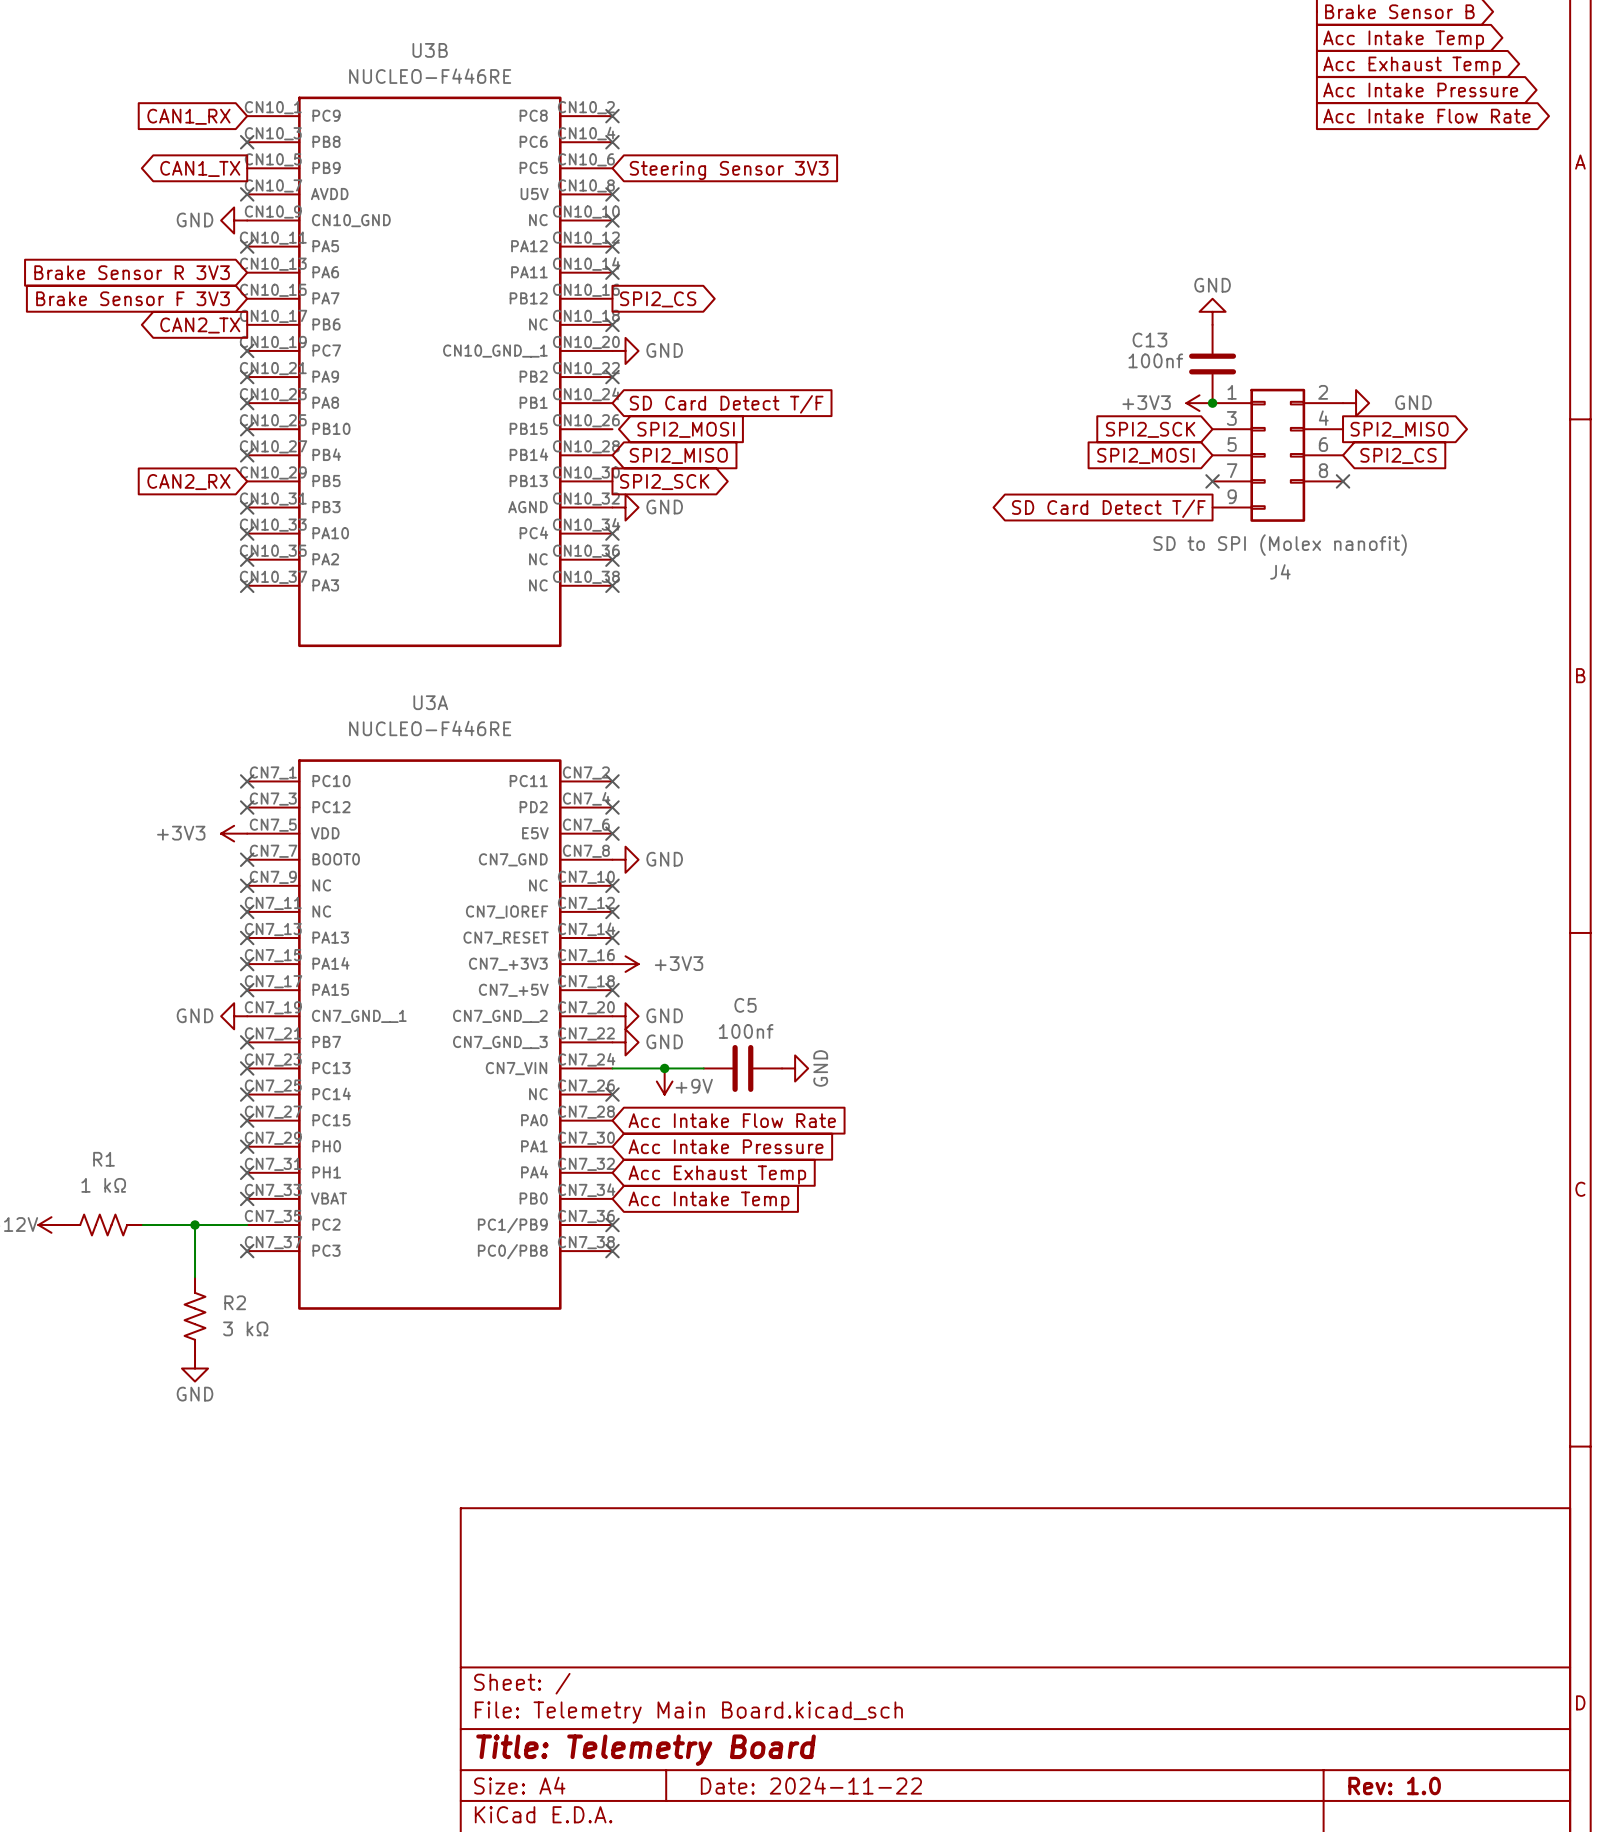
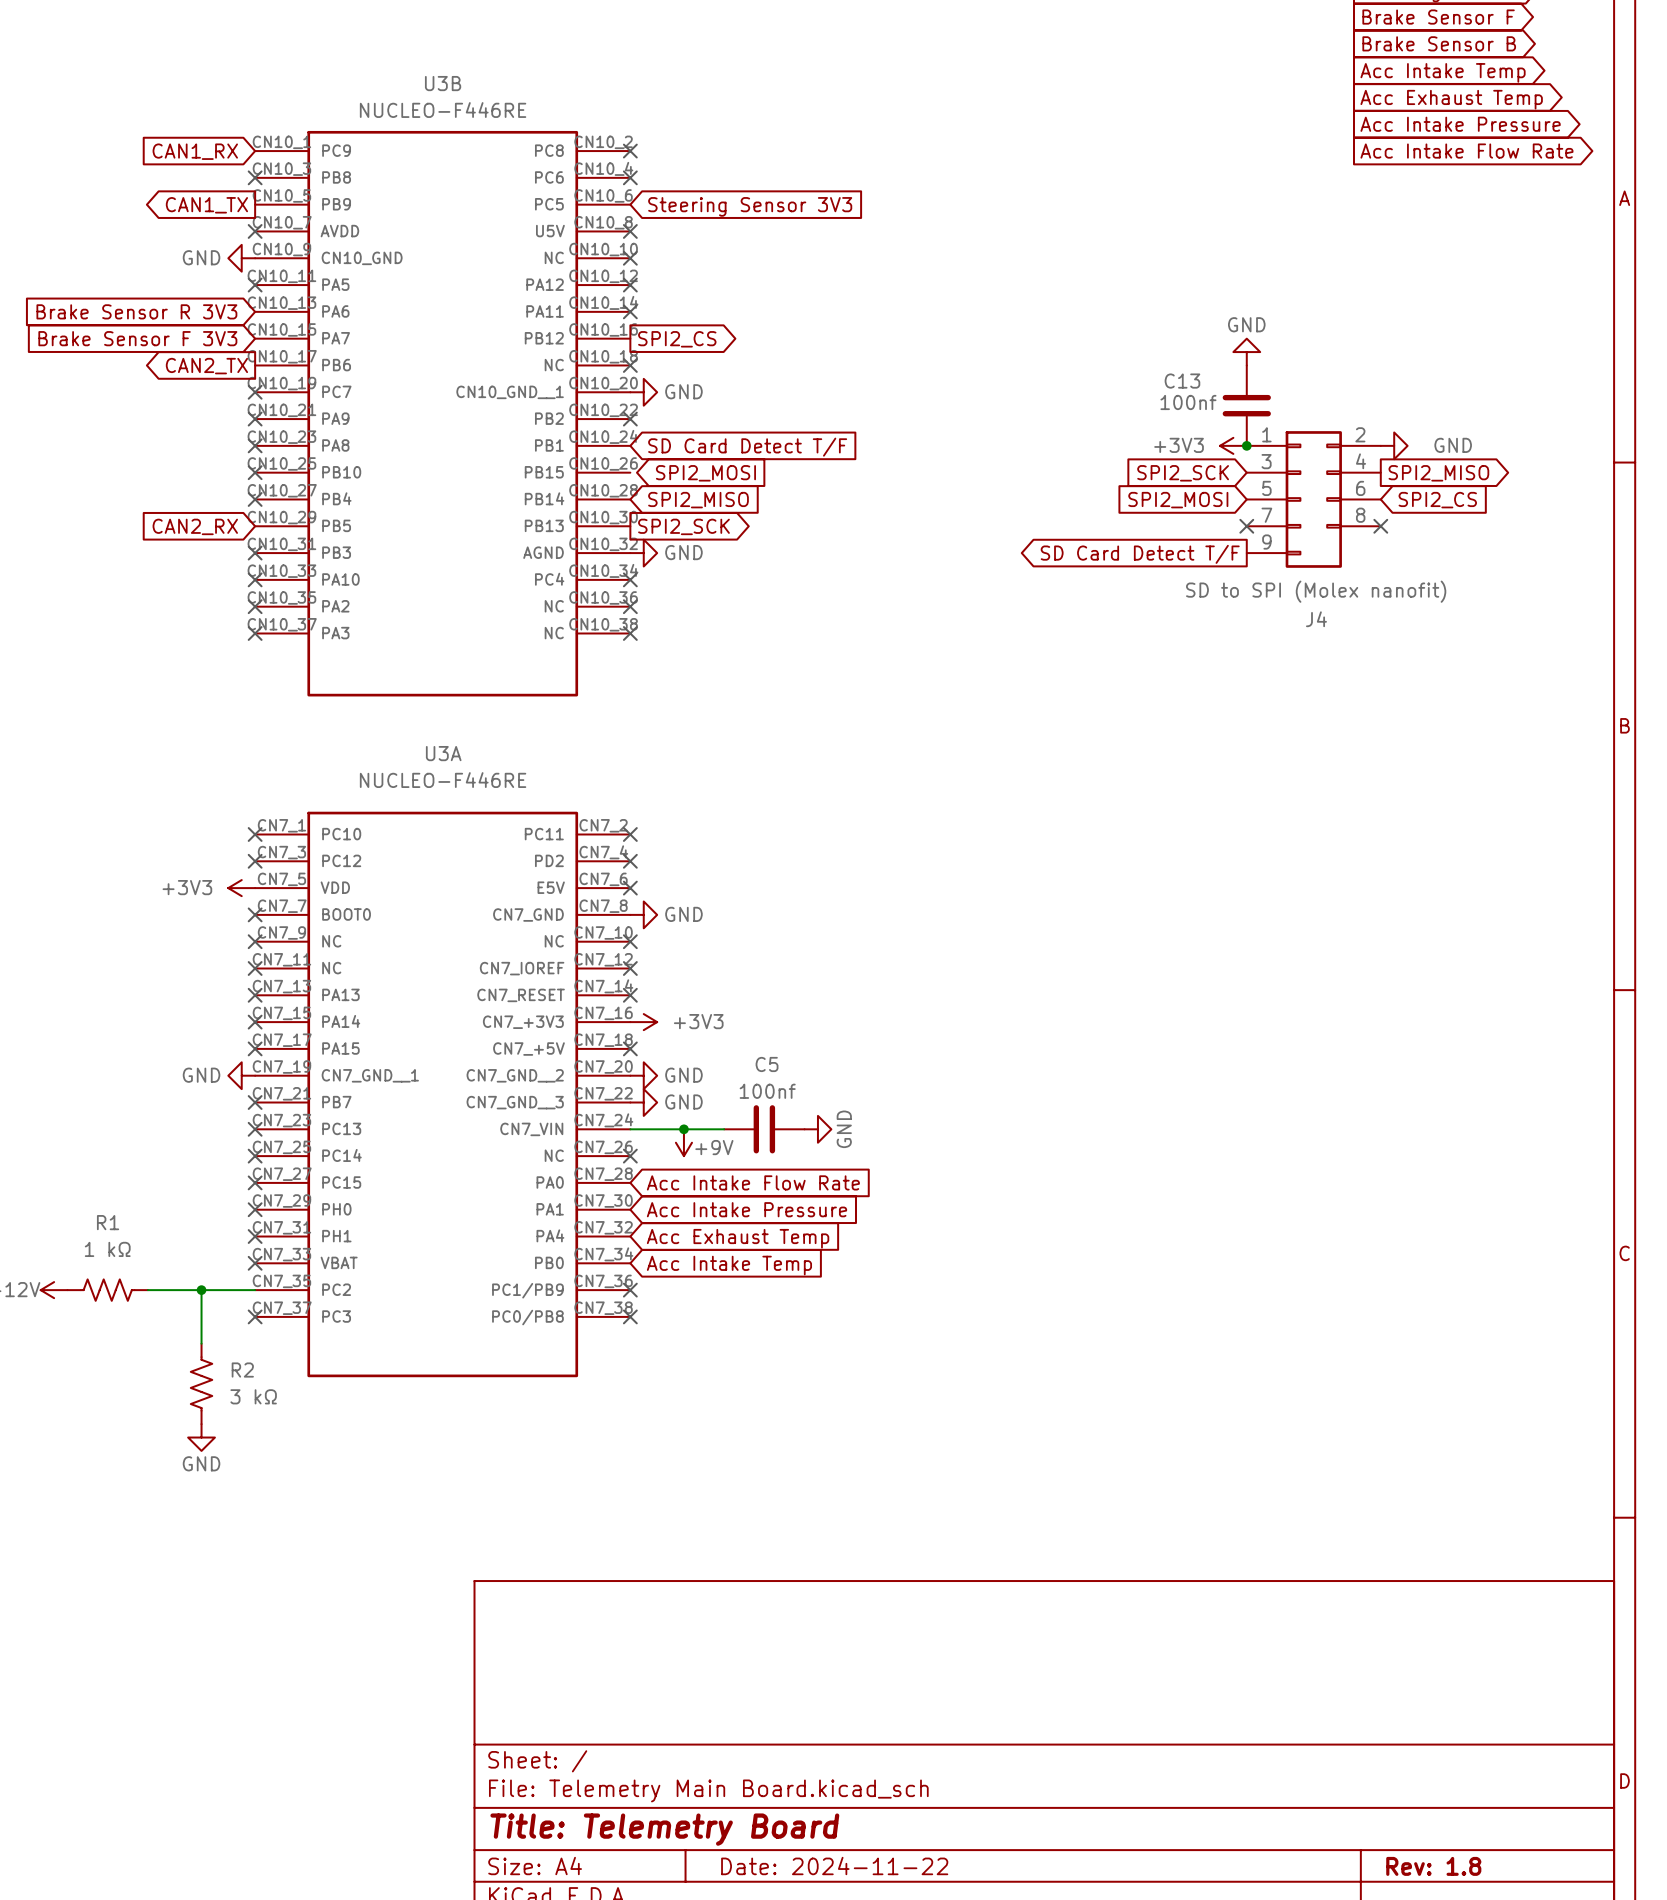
title block: Rev: 1.0 (1394, 1786) -> Rev: 1.8 (1433, 1866)

